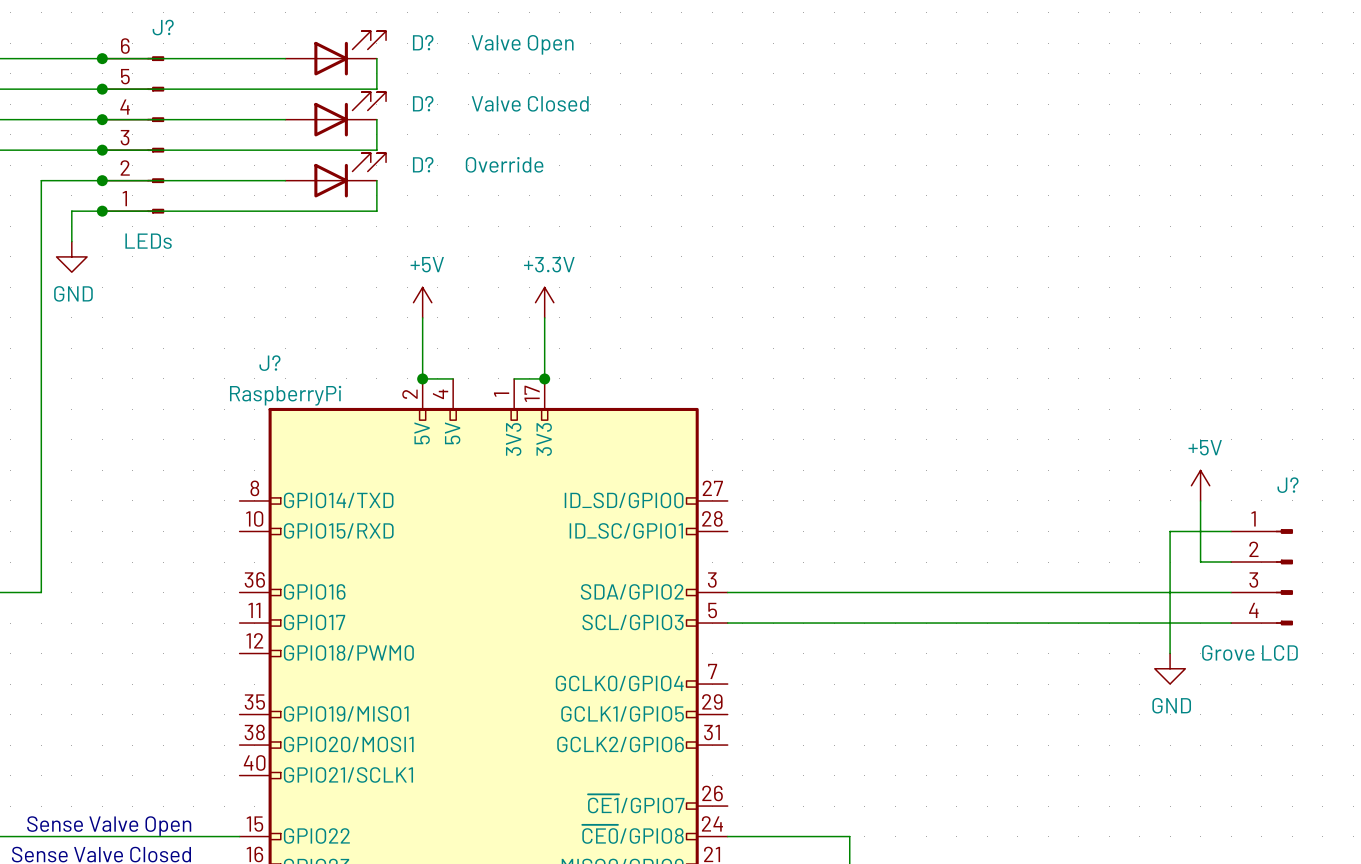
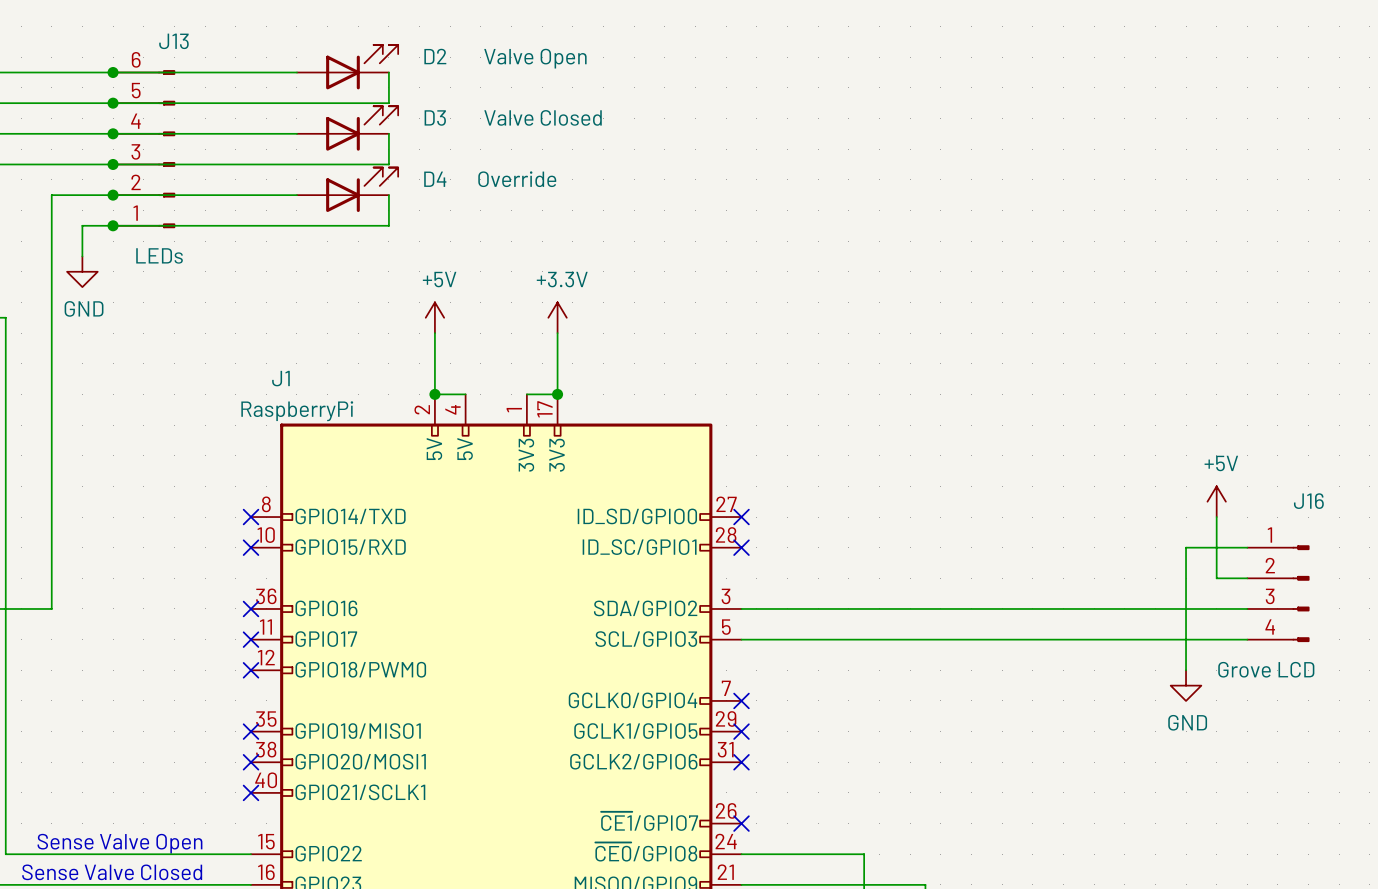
J? name: J? (163, 27) -> J13 (173, 41)
D? name: D? (423, 42) -> D2 (435, 56)
D? name: D? (423, 103) -> D3 (435, 118)
D? name: D? (423, 164) -> D4 (435, 179)
J? name: J? (269, 363) -> J1 (280, 378)
J? name: J? (1287, 485) -> J16 (1308, 501)
no-connect mark: none -> (251, 517)
no-connect mark: none -> (741, 517)
no-connect mark: none -> (251, 547)
no-connect mark: none -> (741, 547)
no-connect mark: none -> (251, 608)
no-connect mark: none -> (251, 639)
no-connect mark: none -> (251, 670)
no-connect mark: none -> (741, 700)
no-connect mark: none -> (251, 731)
no-connect mark: none -> (741, 731)
no-connect mark: none -> (251, 762)
no-connect mark: none -> (741, 762)
no-connect mark: none -> (251, 792)
no-connect mark: none -> (741, 823)

